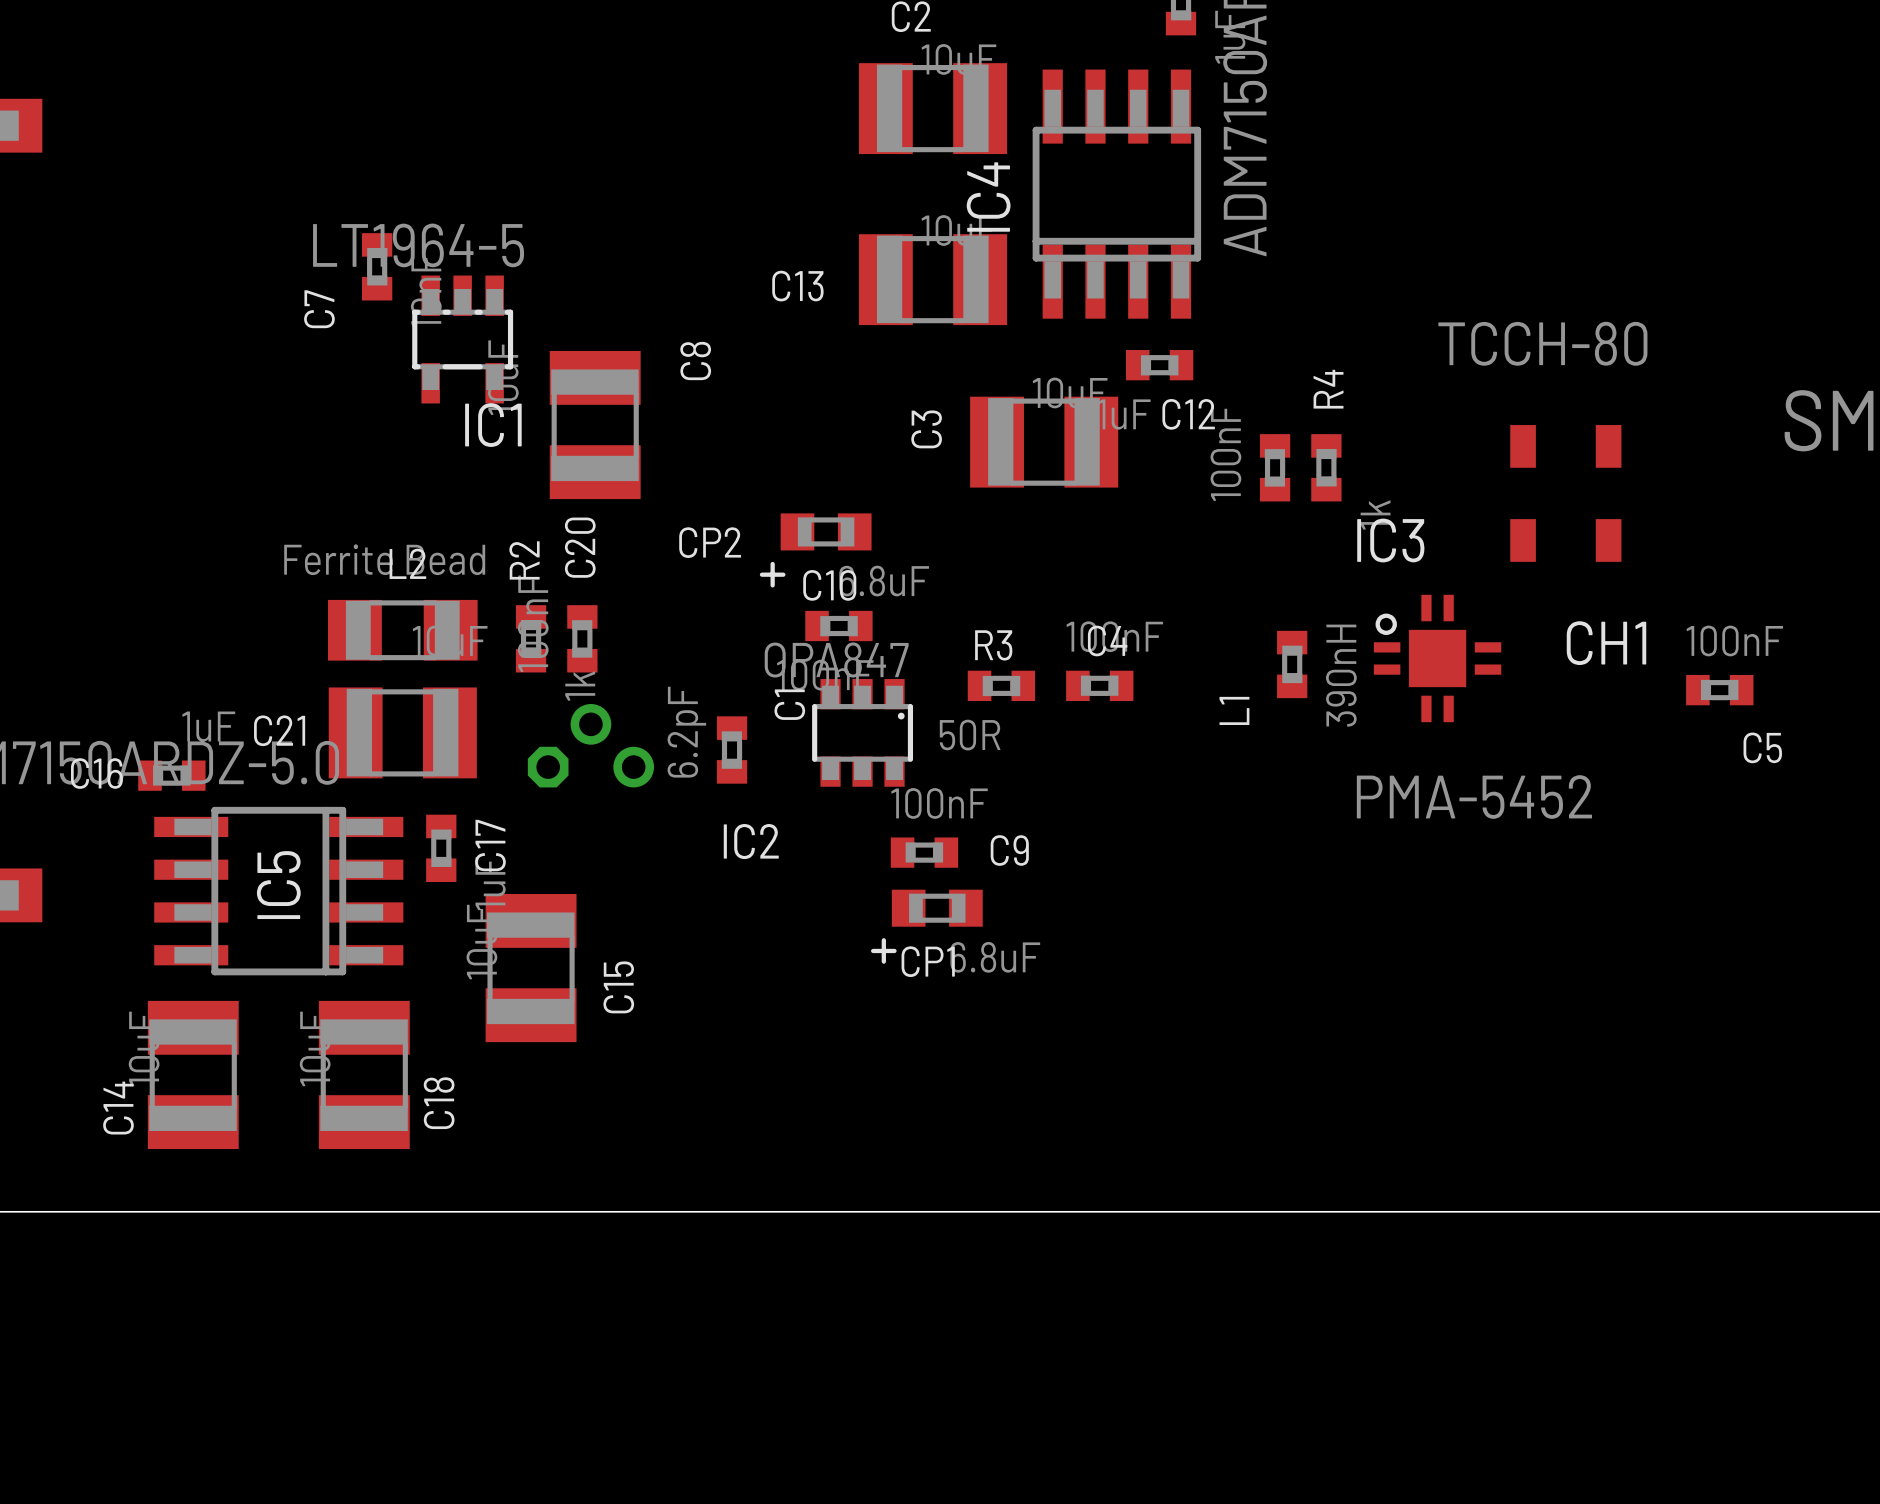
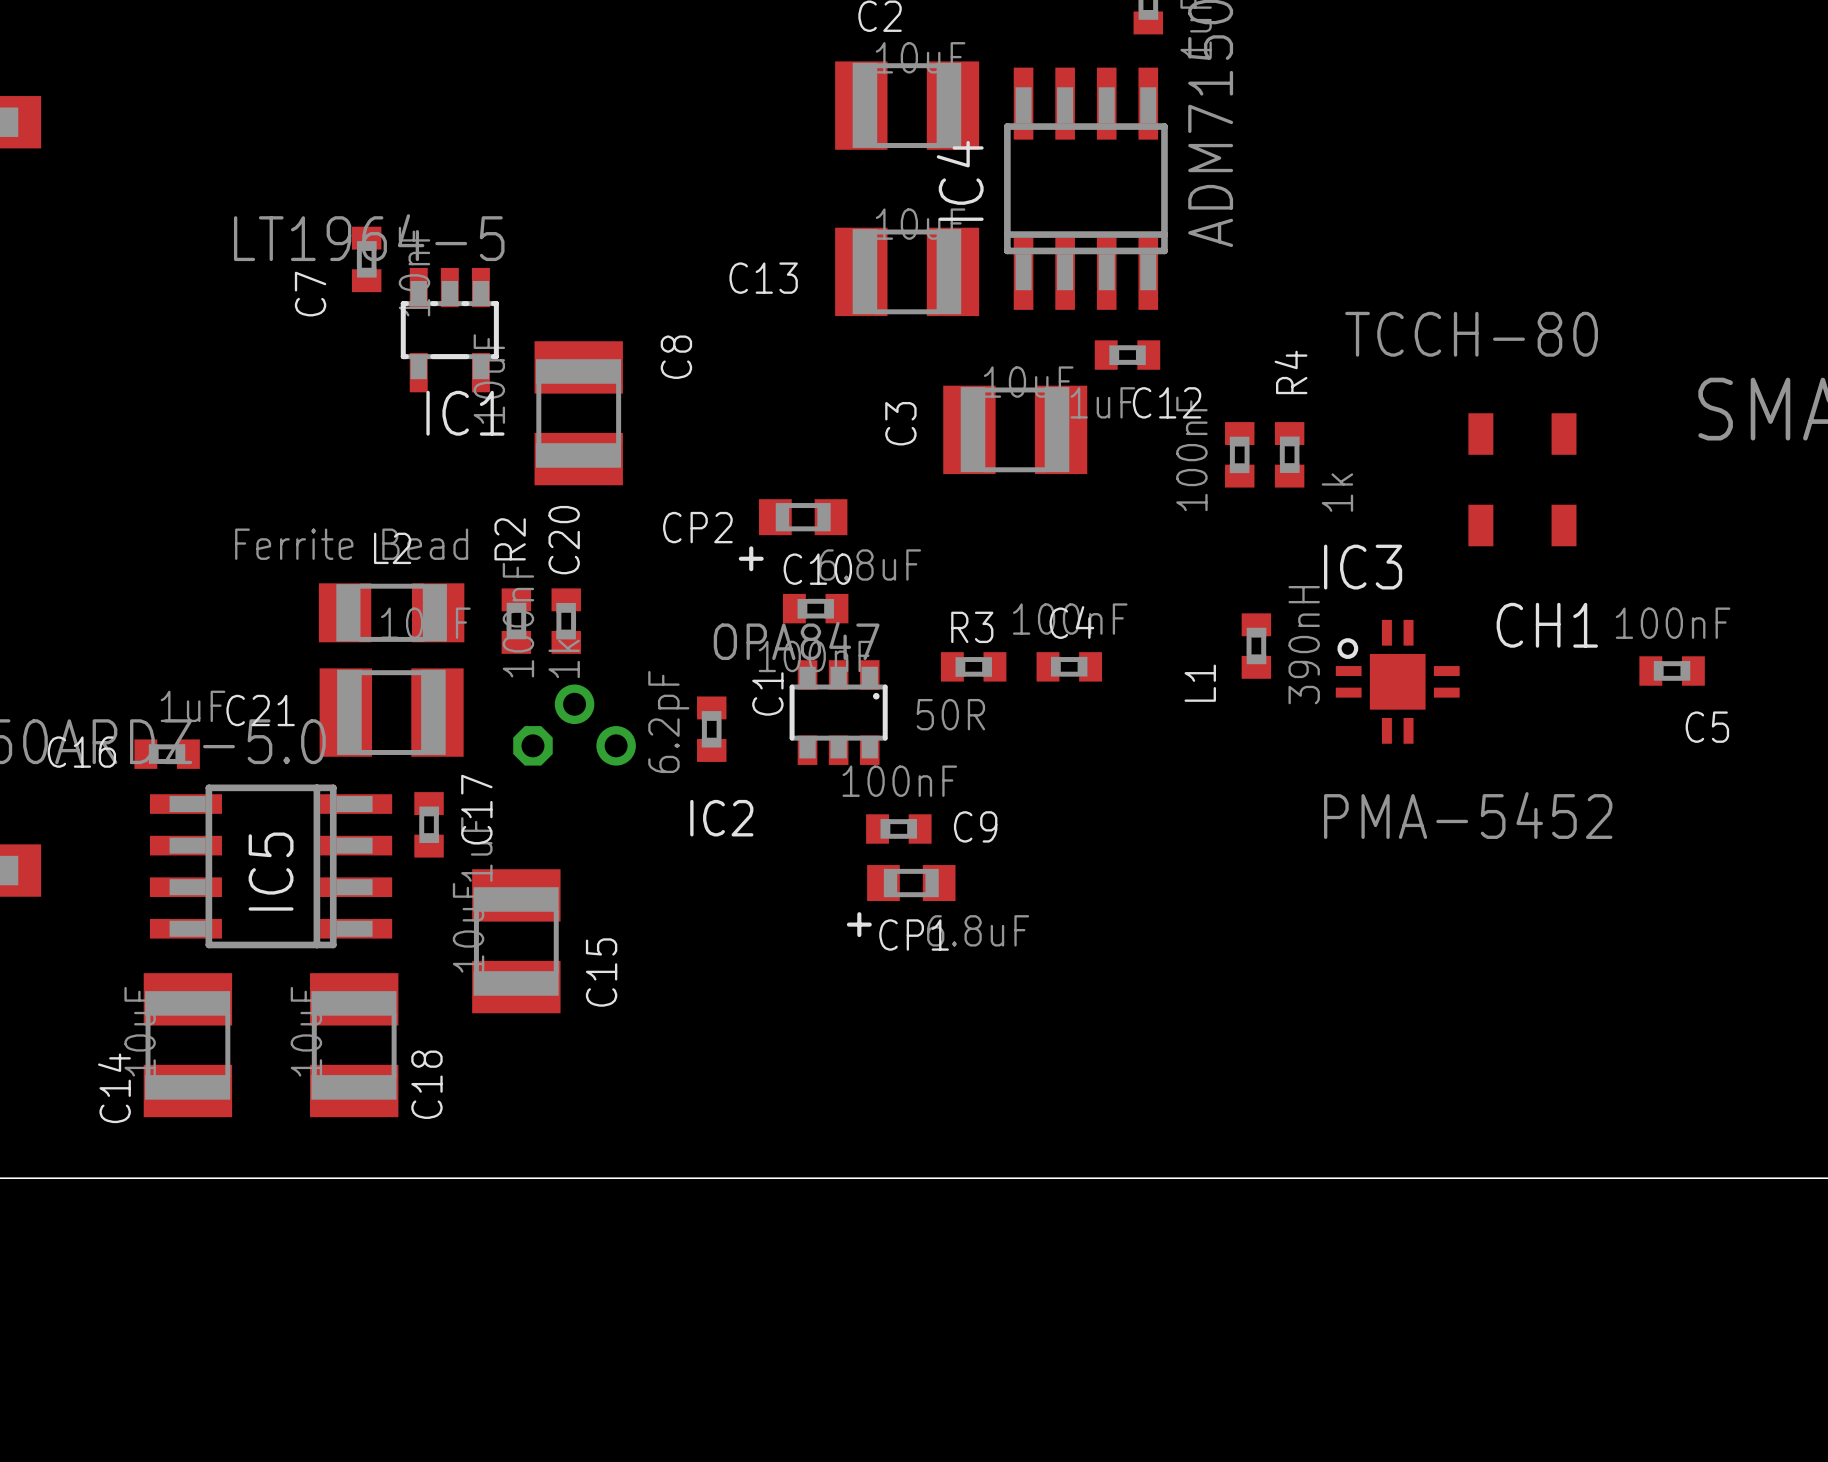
IC3 position: (1437, 658) -> (1397, 681)

